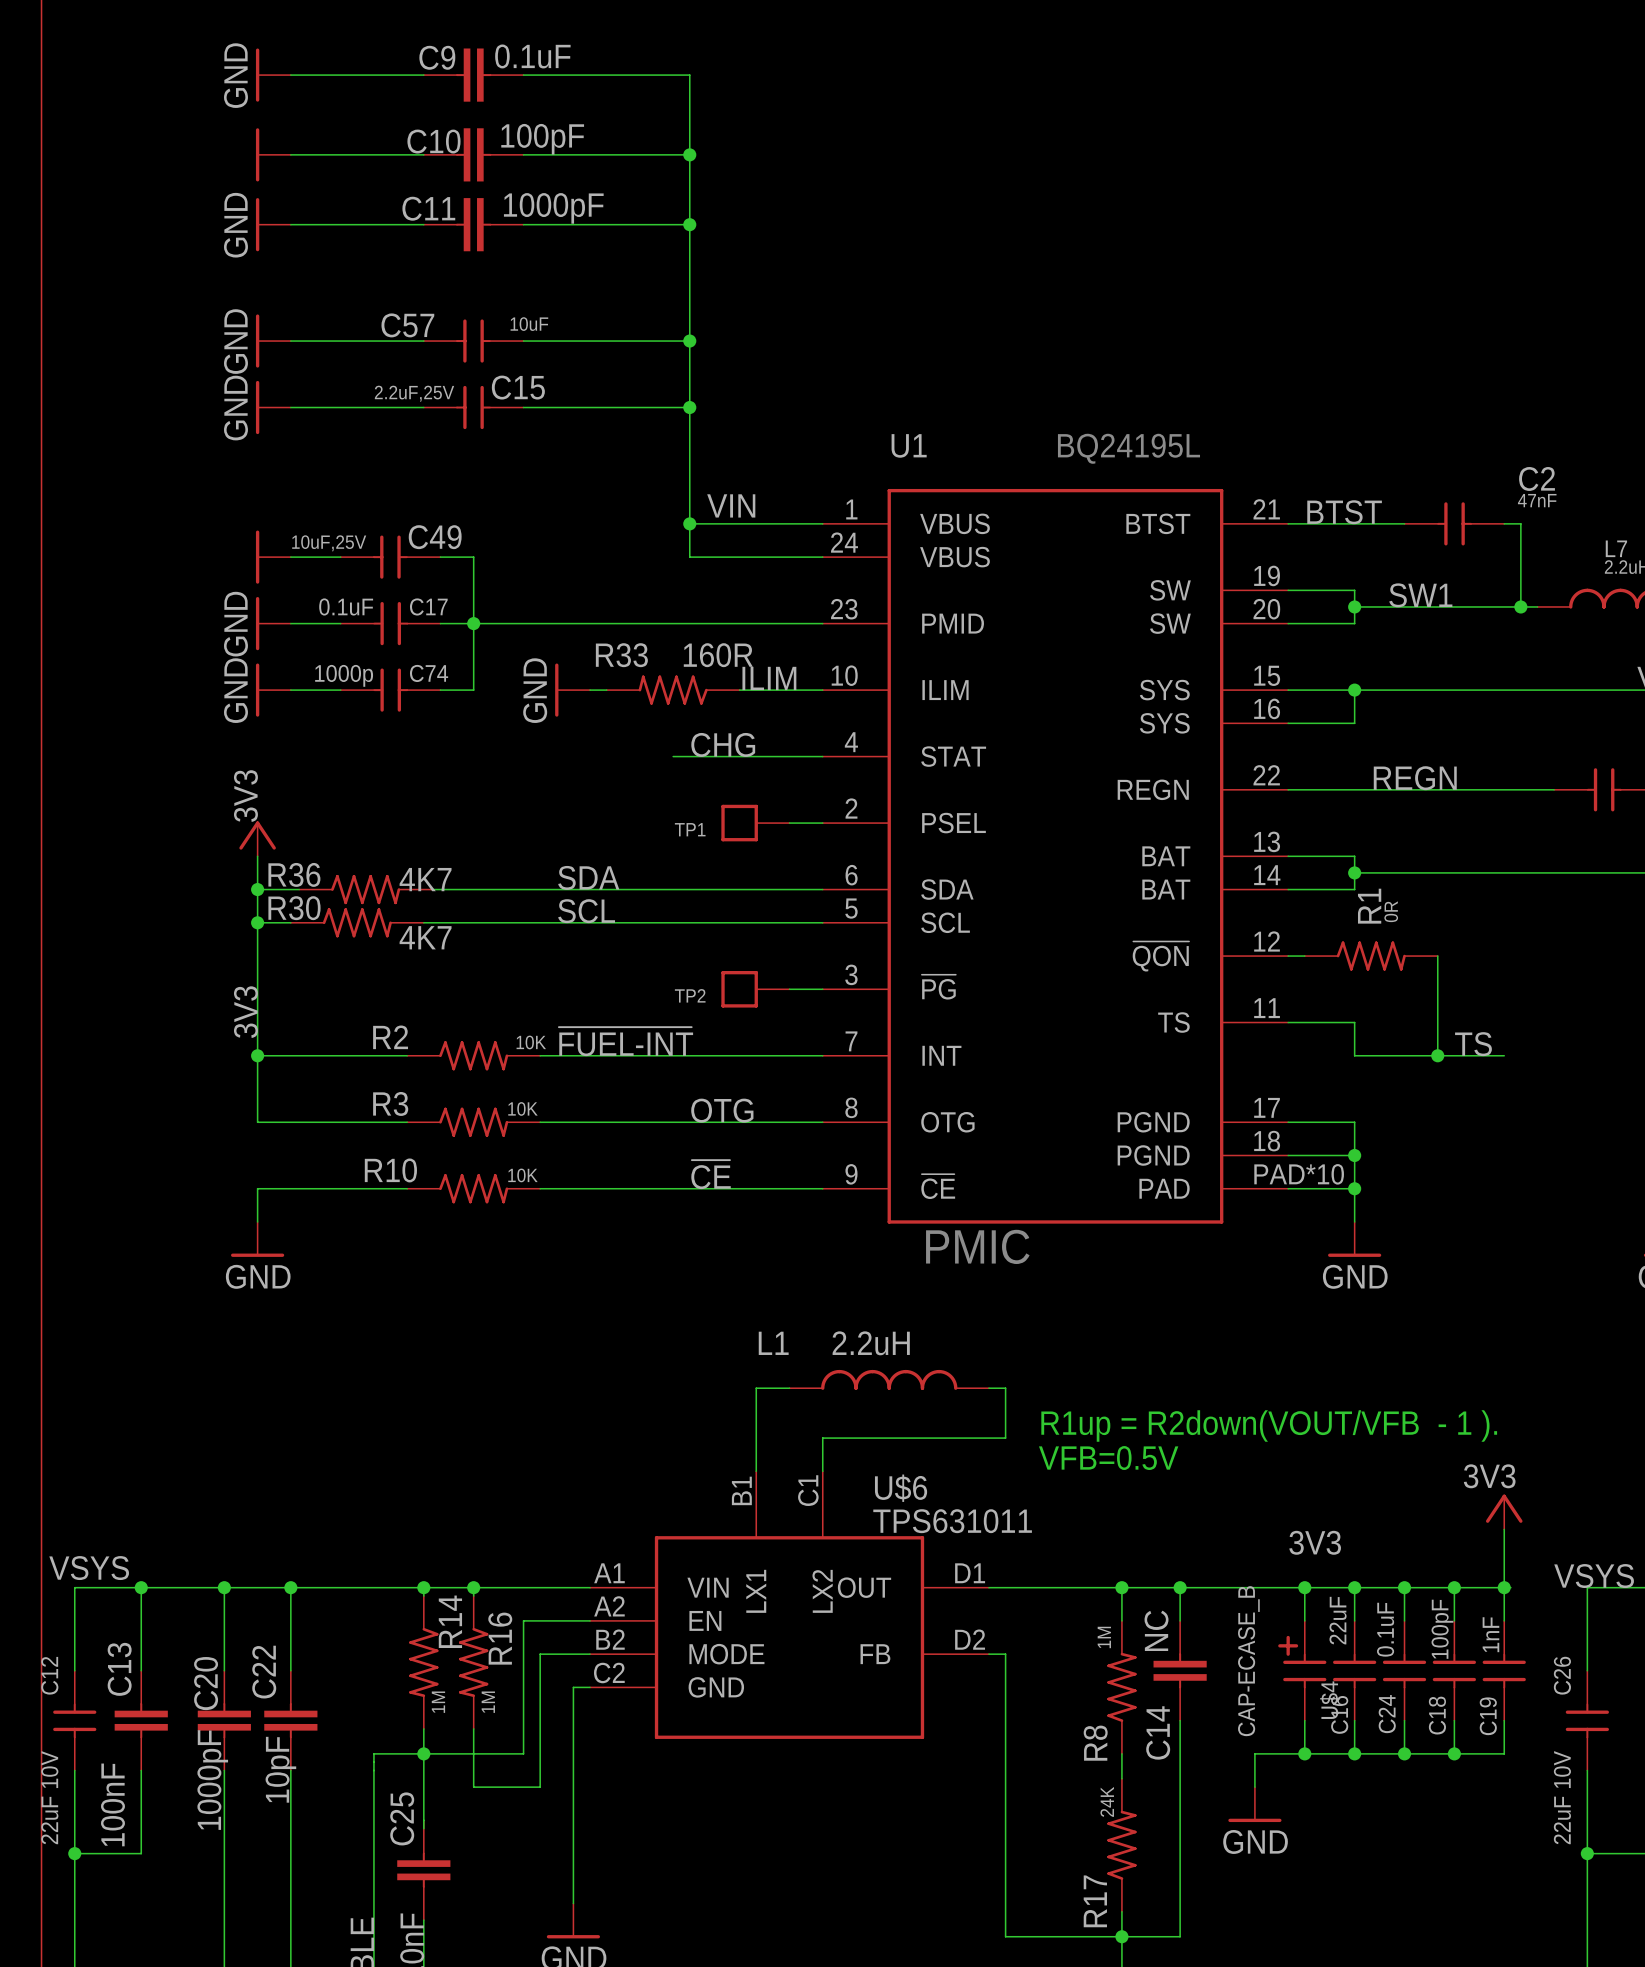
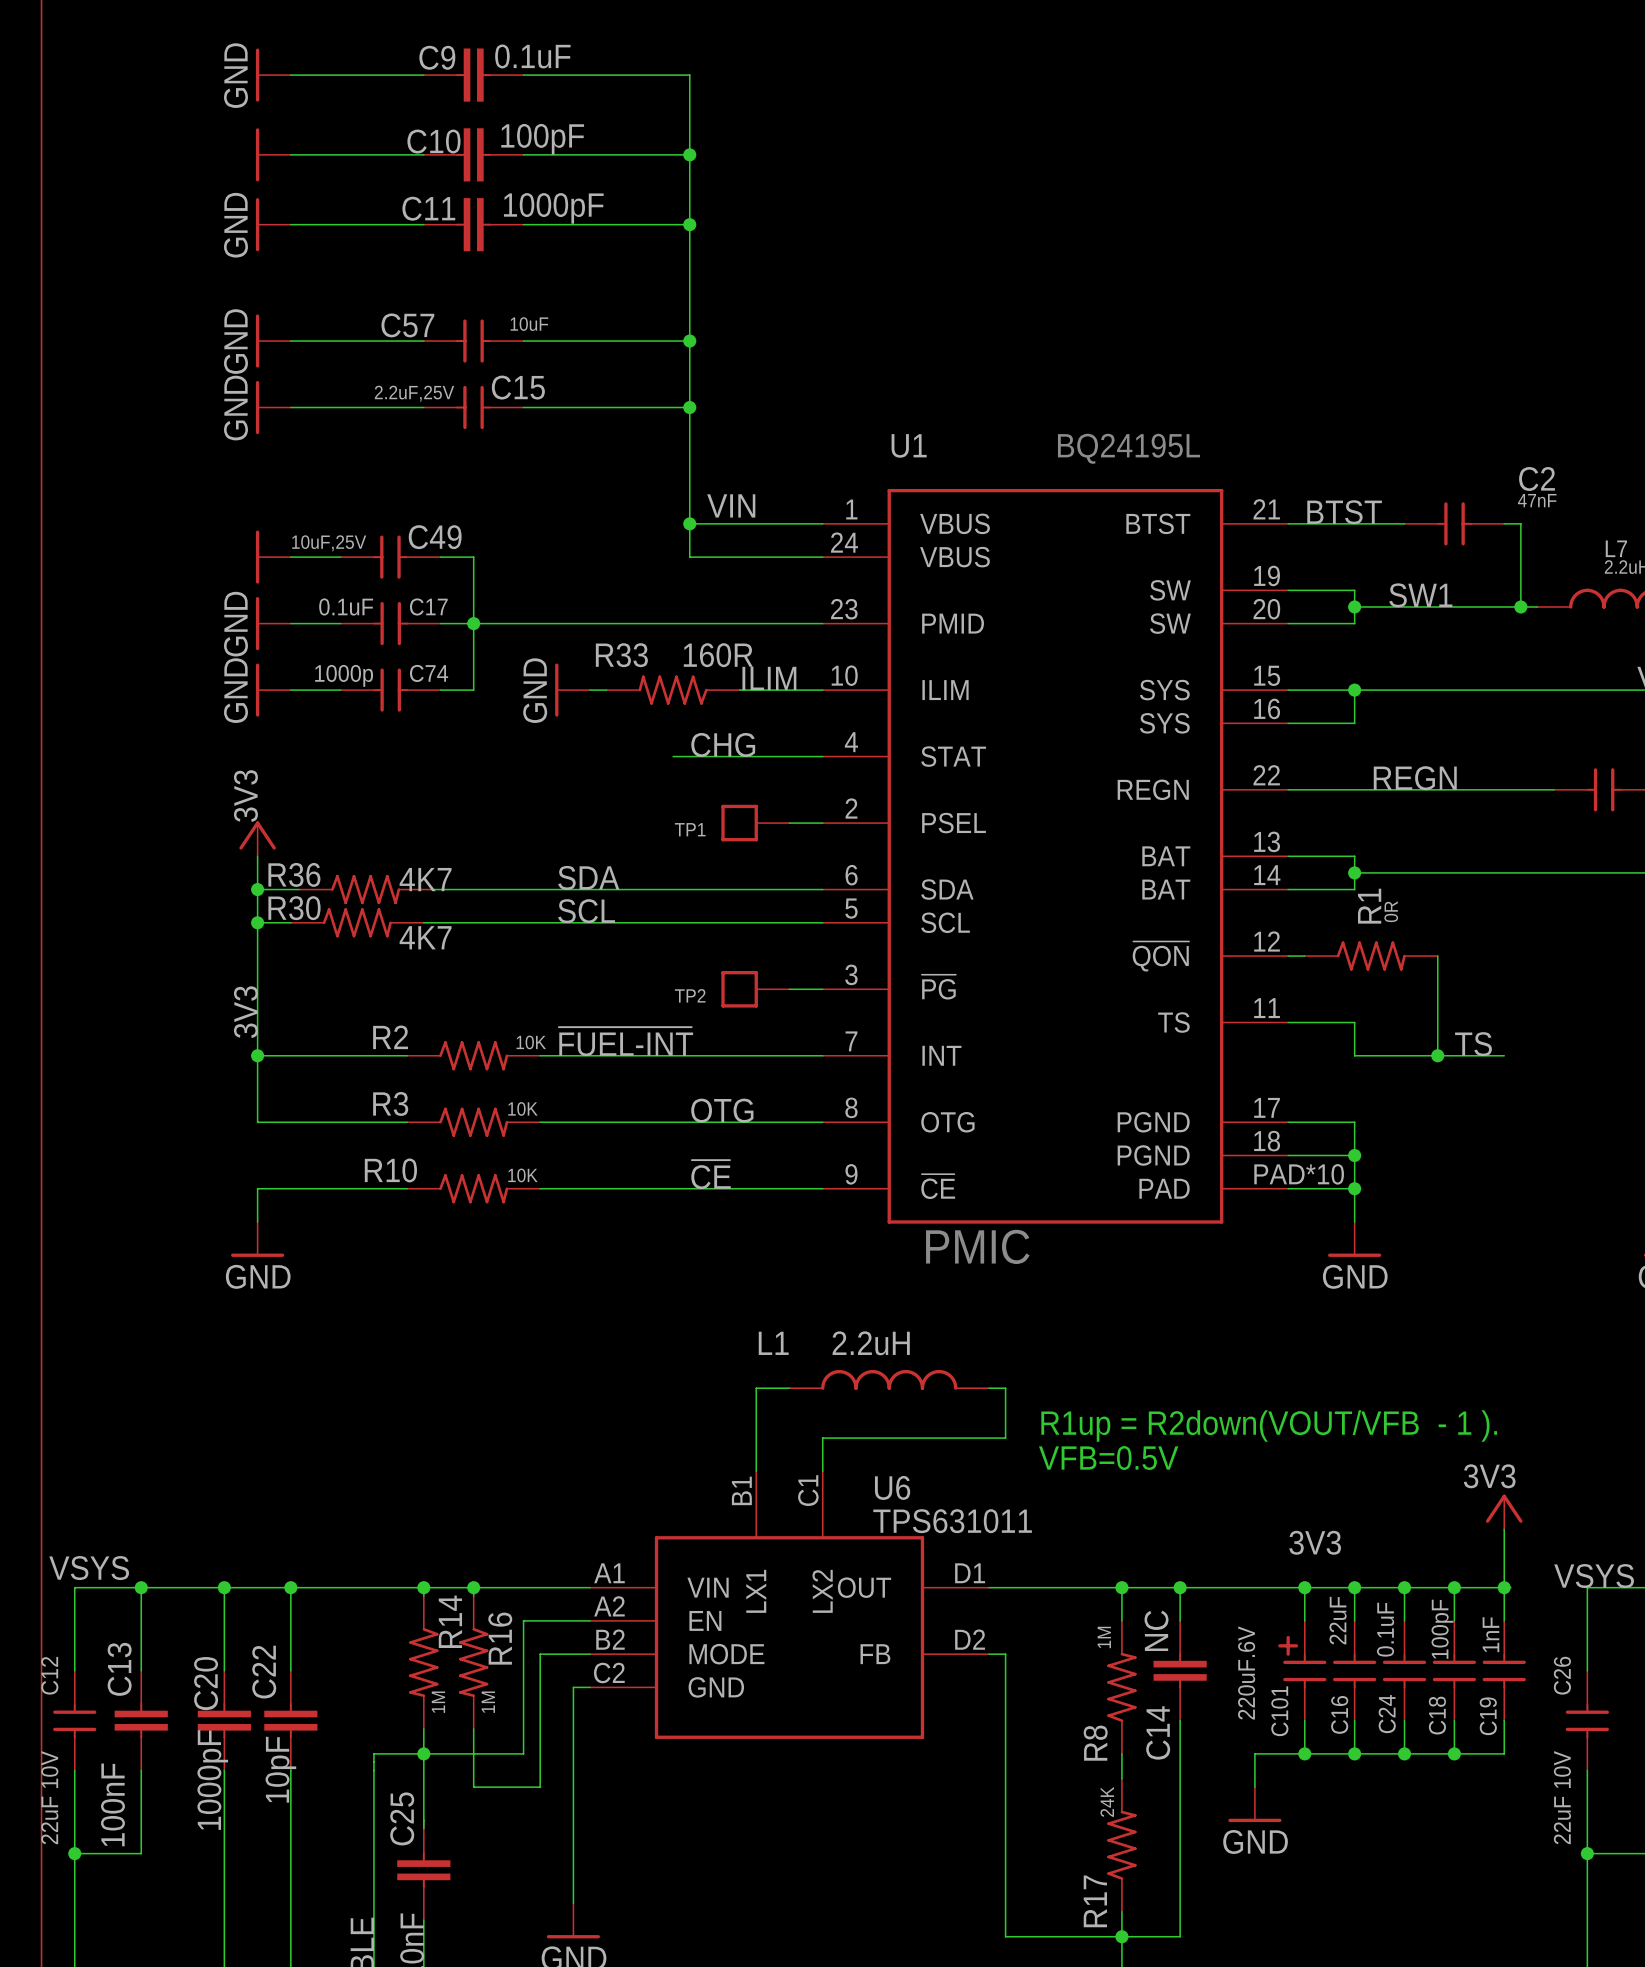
U$6 name: U$6 (901, 1488) -> U6 (892, 1487)
U$4 value: CAP-ECASE_B (1248, 1661) -> 220uF.6V (1246, 1673)
U$4 name: U$4 (1329, 1700) -> C101 (1279, 1711)

